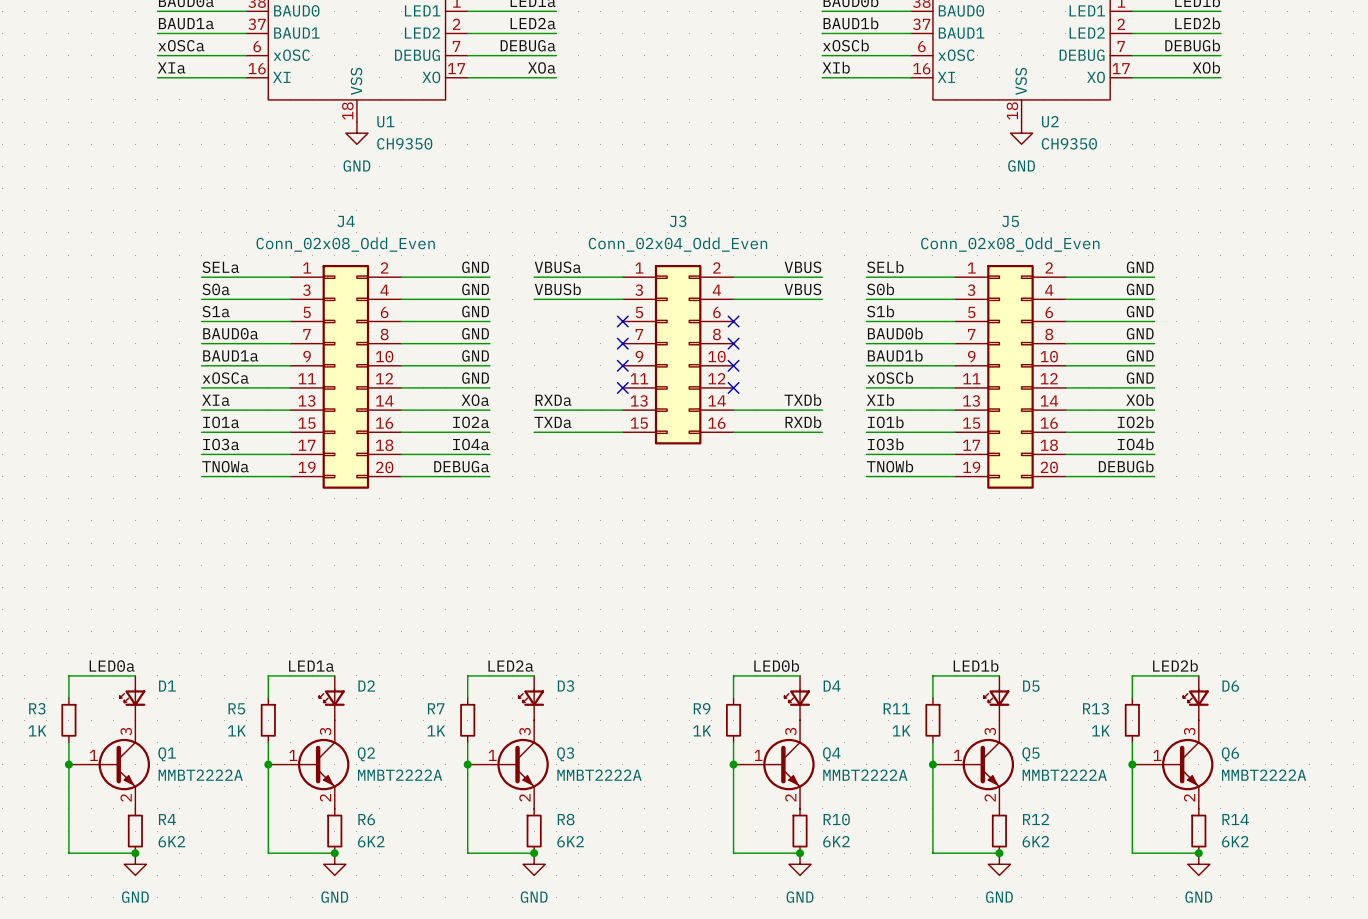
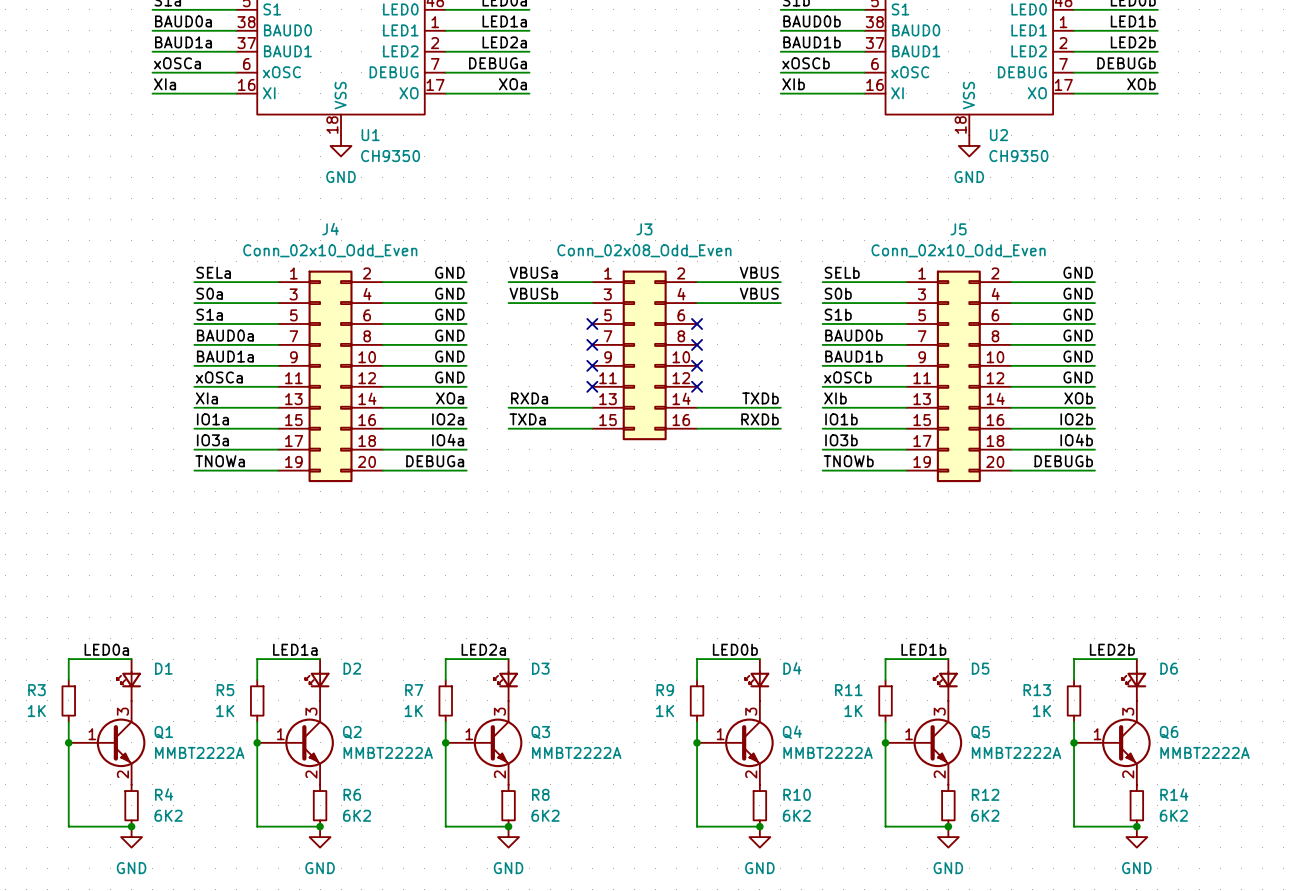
J4 value: Conn_02x08_Odd_Even (345, 244) -> Conn_02x10_Odd_Even (330, 250)
J3 value: Conn_02x04_Odd_Even (677, 244) -> Conn_02x08_Odd_Even (644, 250)
J5 value: Conn_02x08_Odd_Even (1010, 244) -> Conn_02x10_Odd_Even (958, 250)

